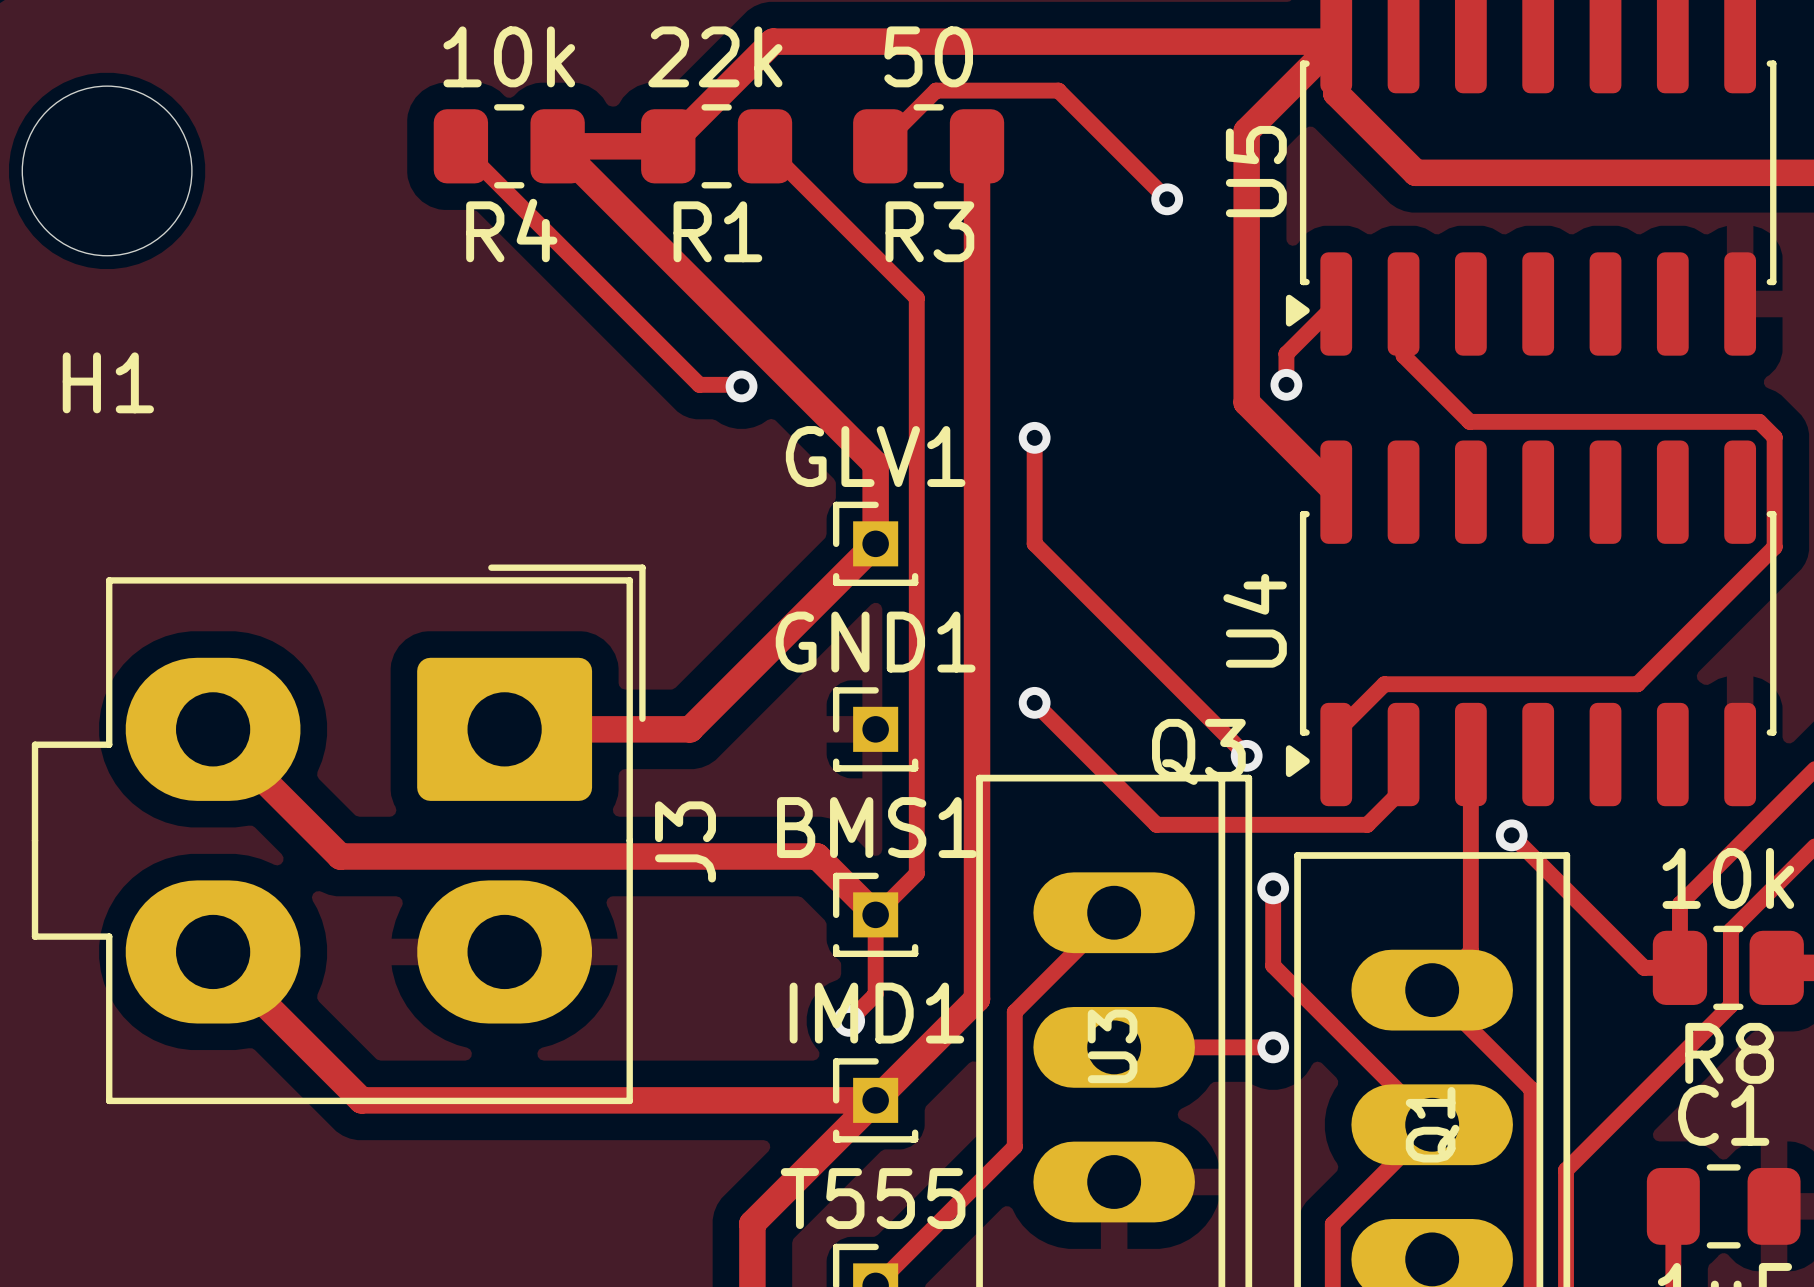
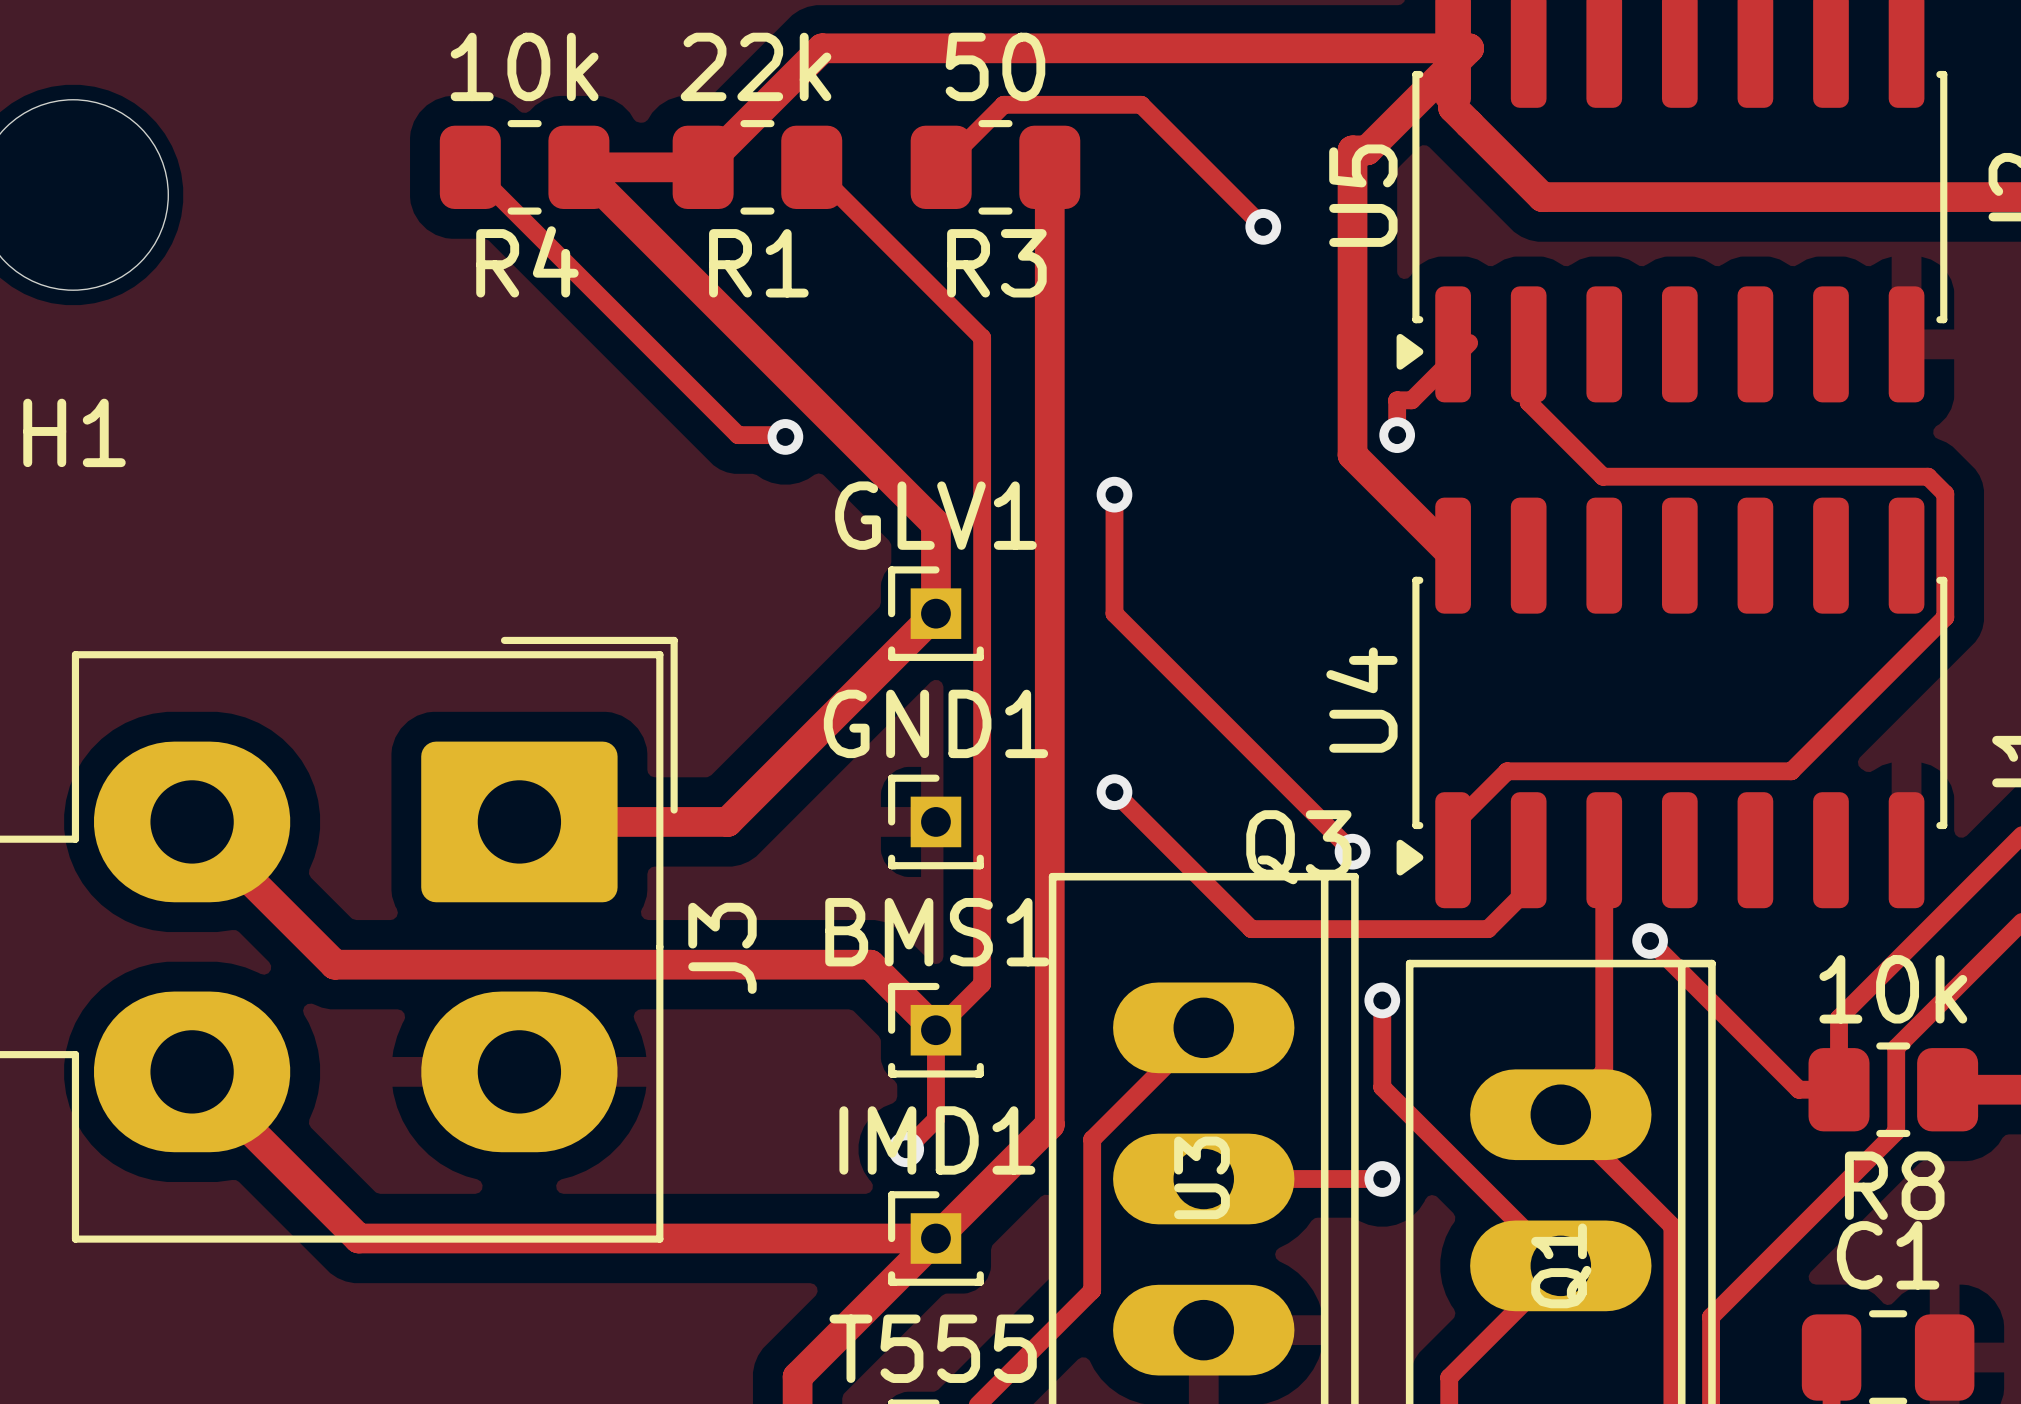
track: (772, 41) (1336, 41) (1246, 131) -> (820, 49) (1469, 48) (1367, 150) (1352, 150)
track: (1336, 304) (1286, 353) -> (1469, 342) (1411, 400) (1397, 400)

